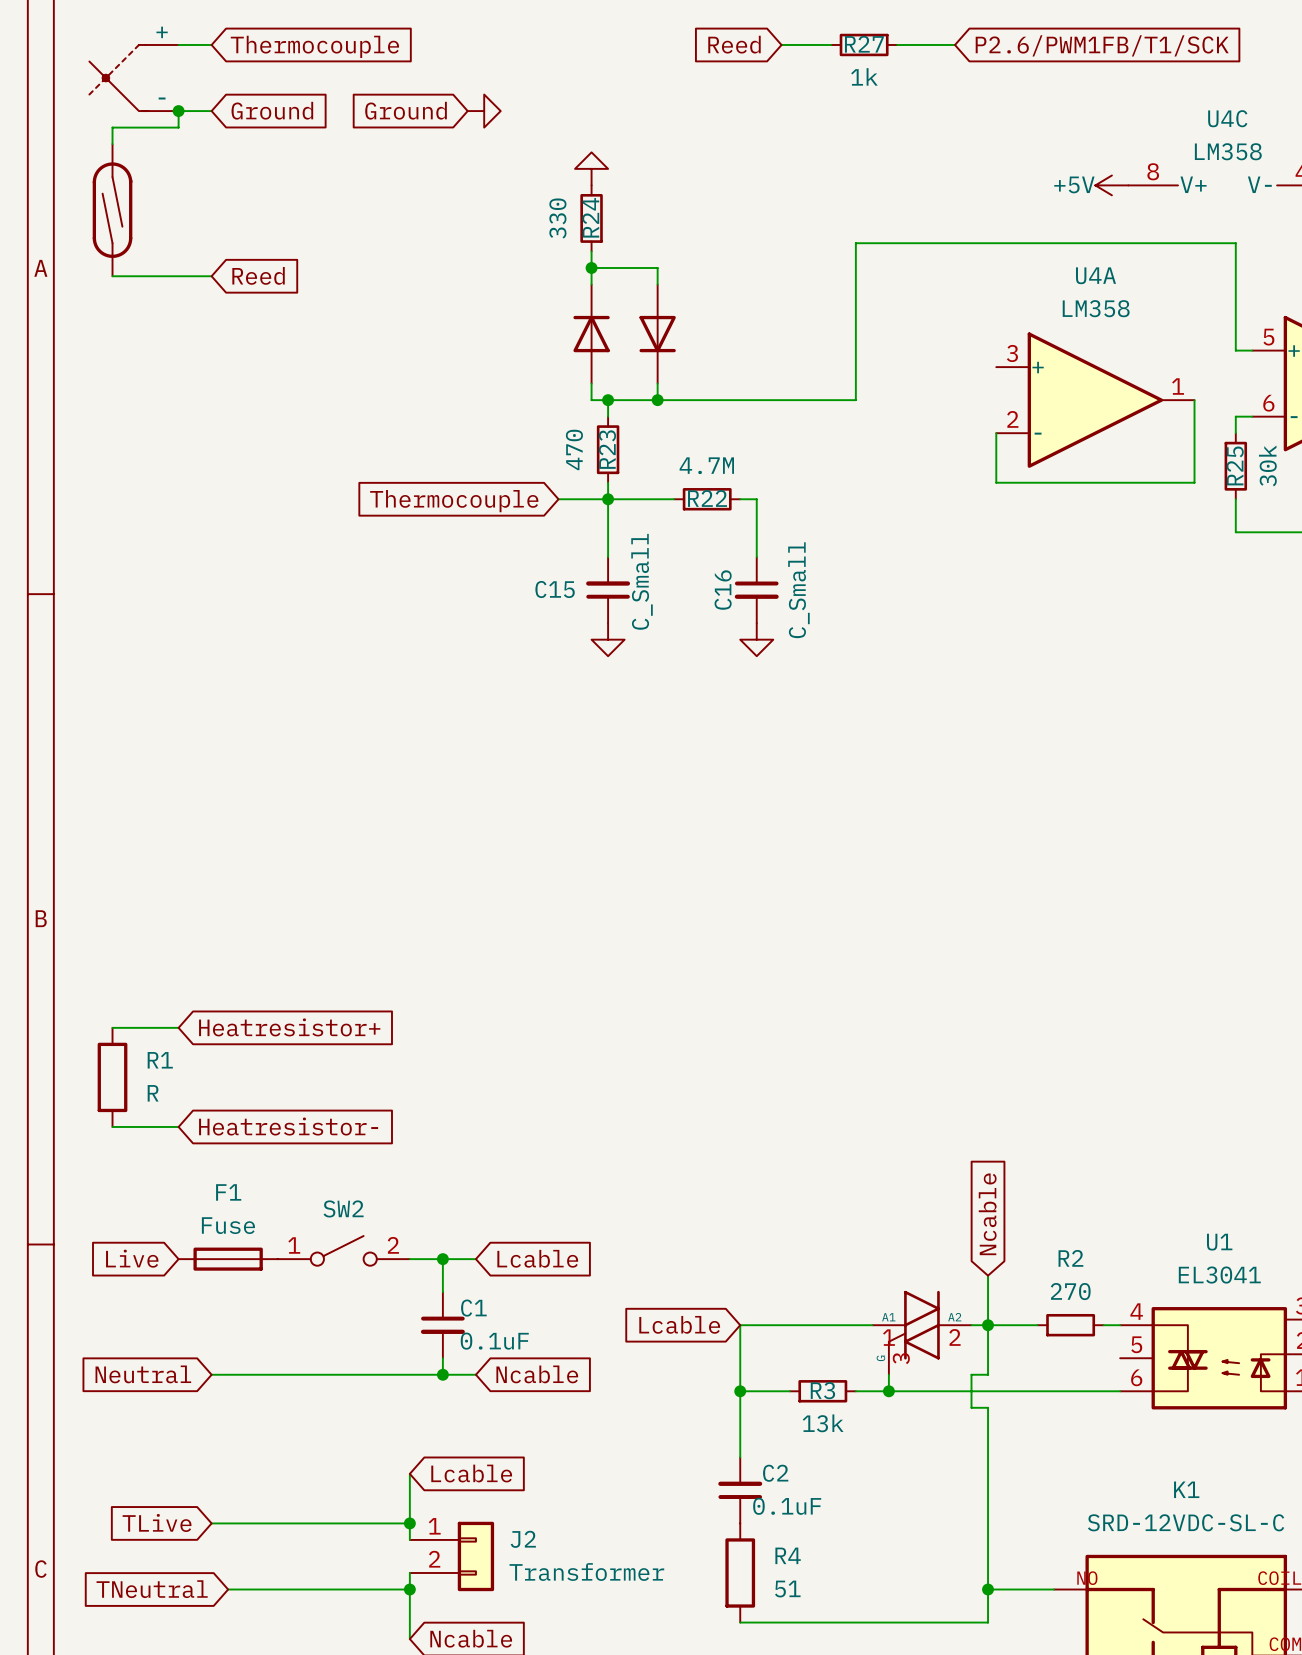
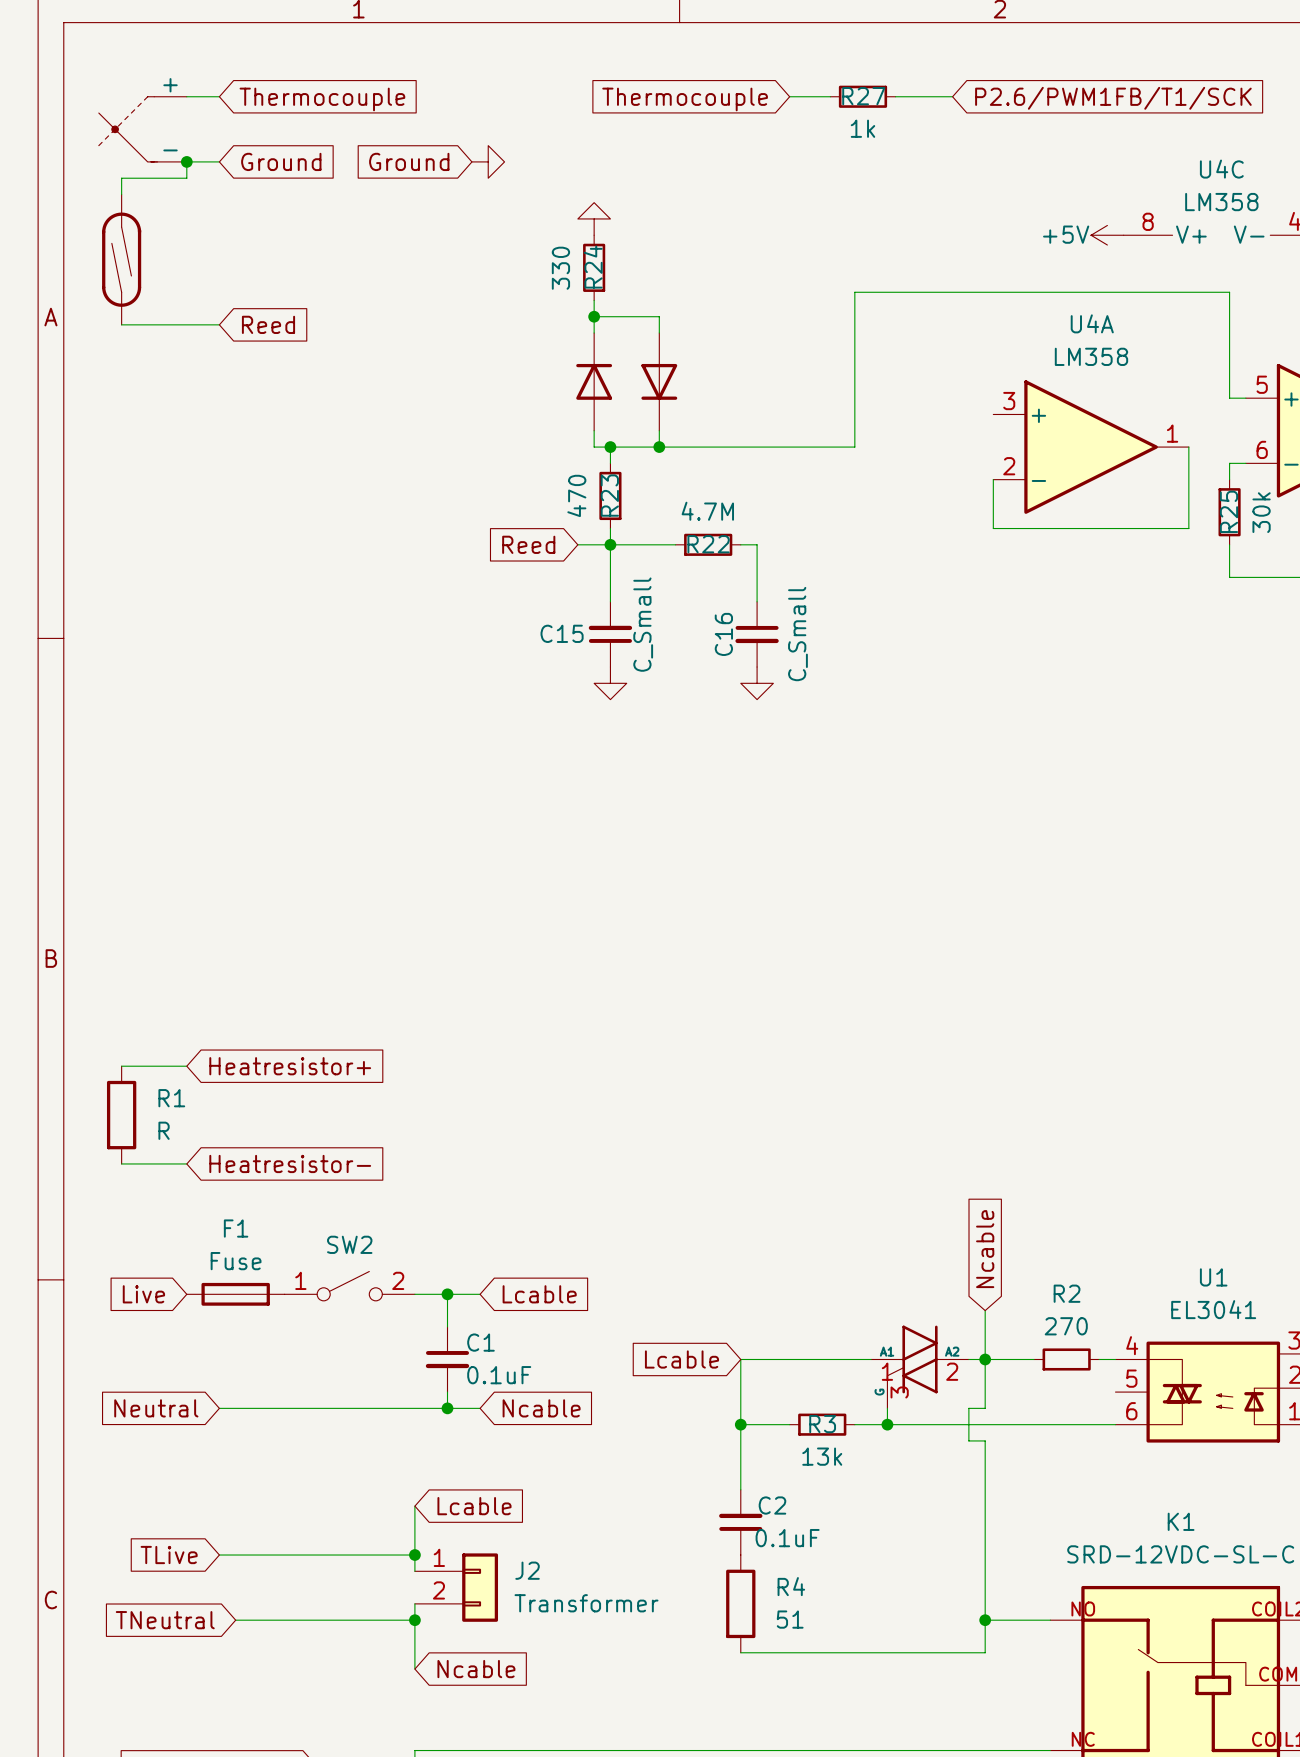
global label: Reed (734, 44) -> Thermocouple (685, 99)
wire: (781, 44) (789, 44) -> none
global label: none -> Reed (528, 544)
wire: (558, 499) (575, 499) -> none
global label: Thermocouple (454, 501) -> none

